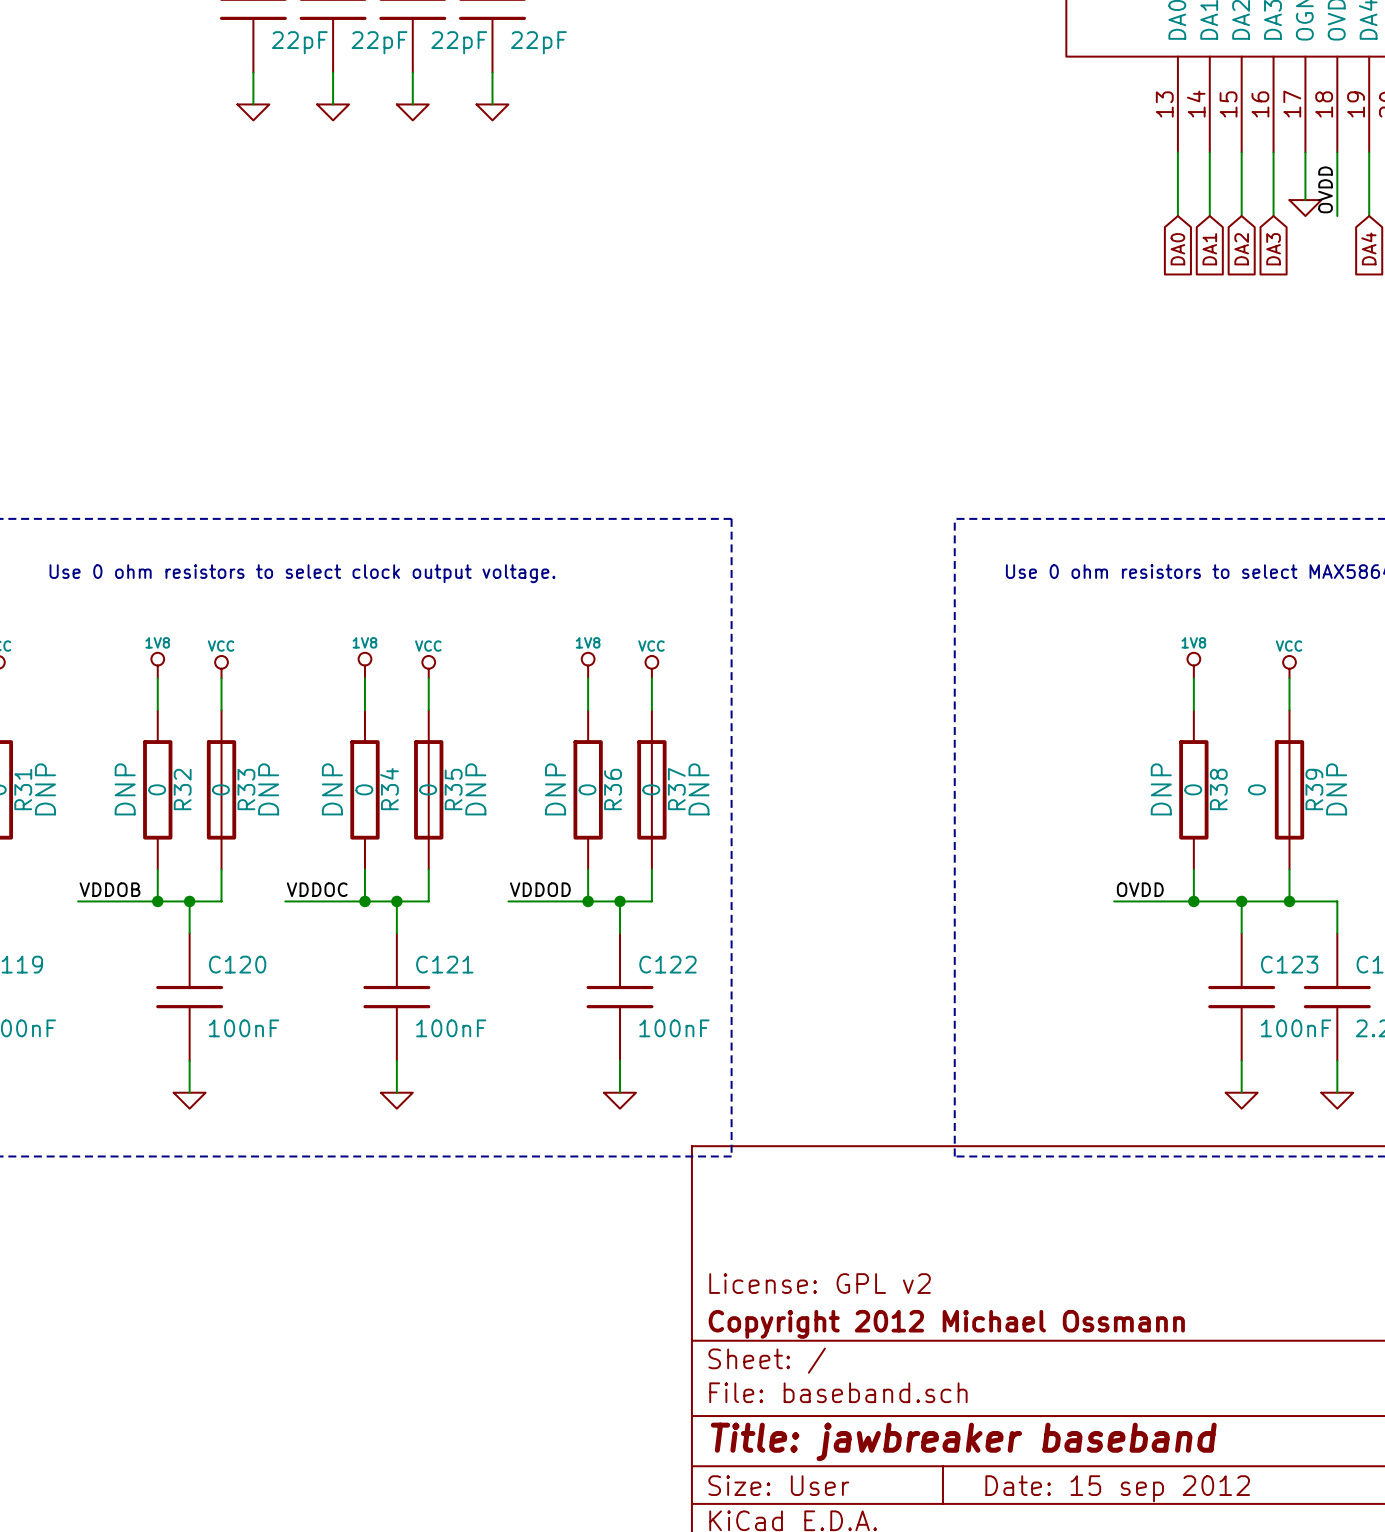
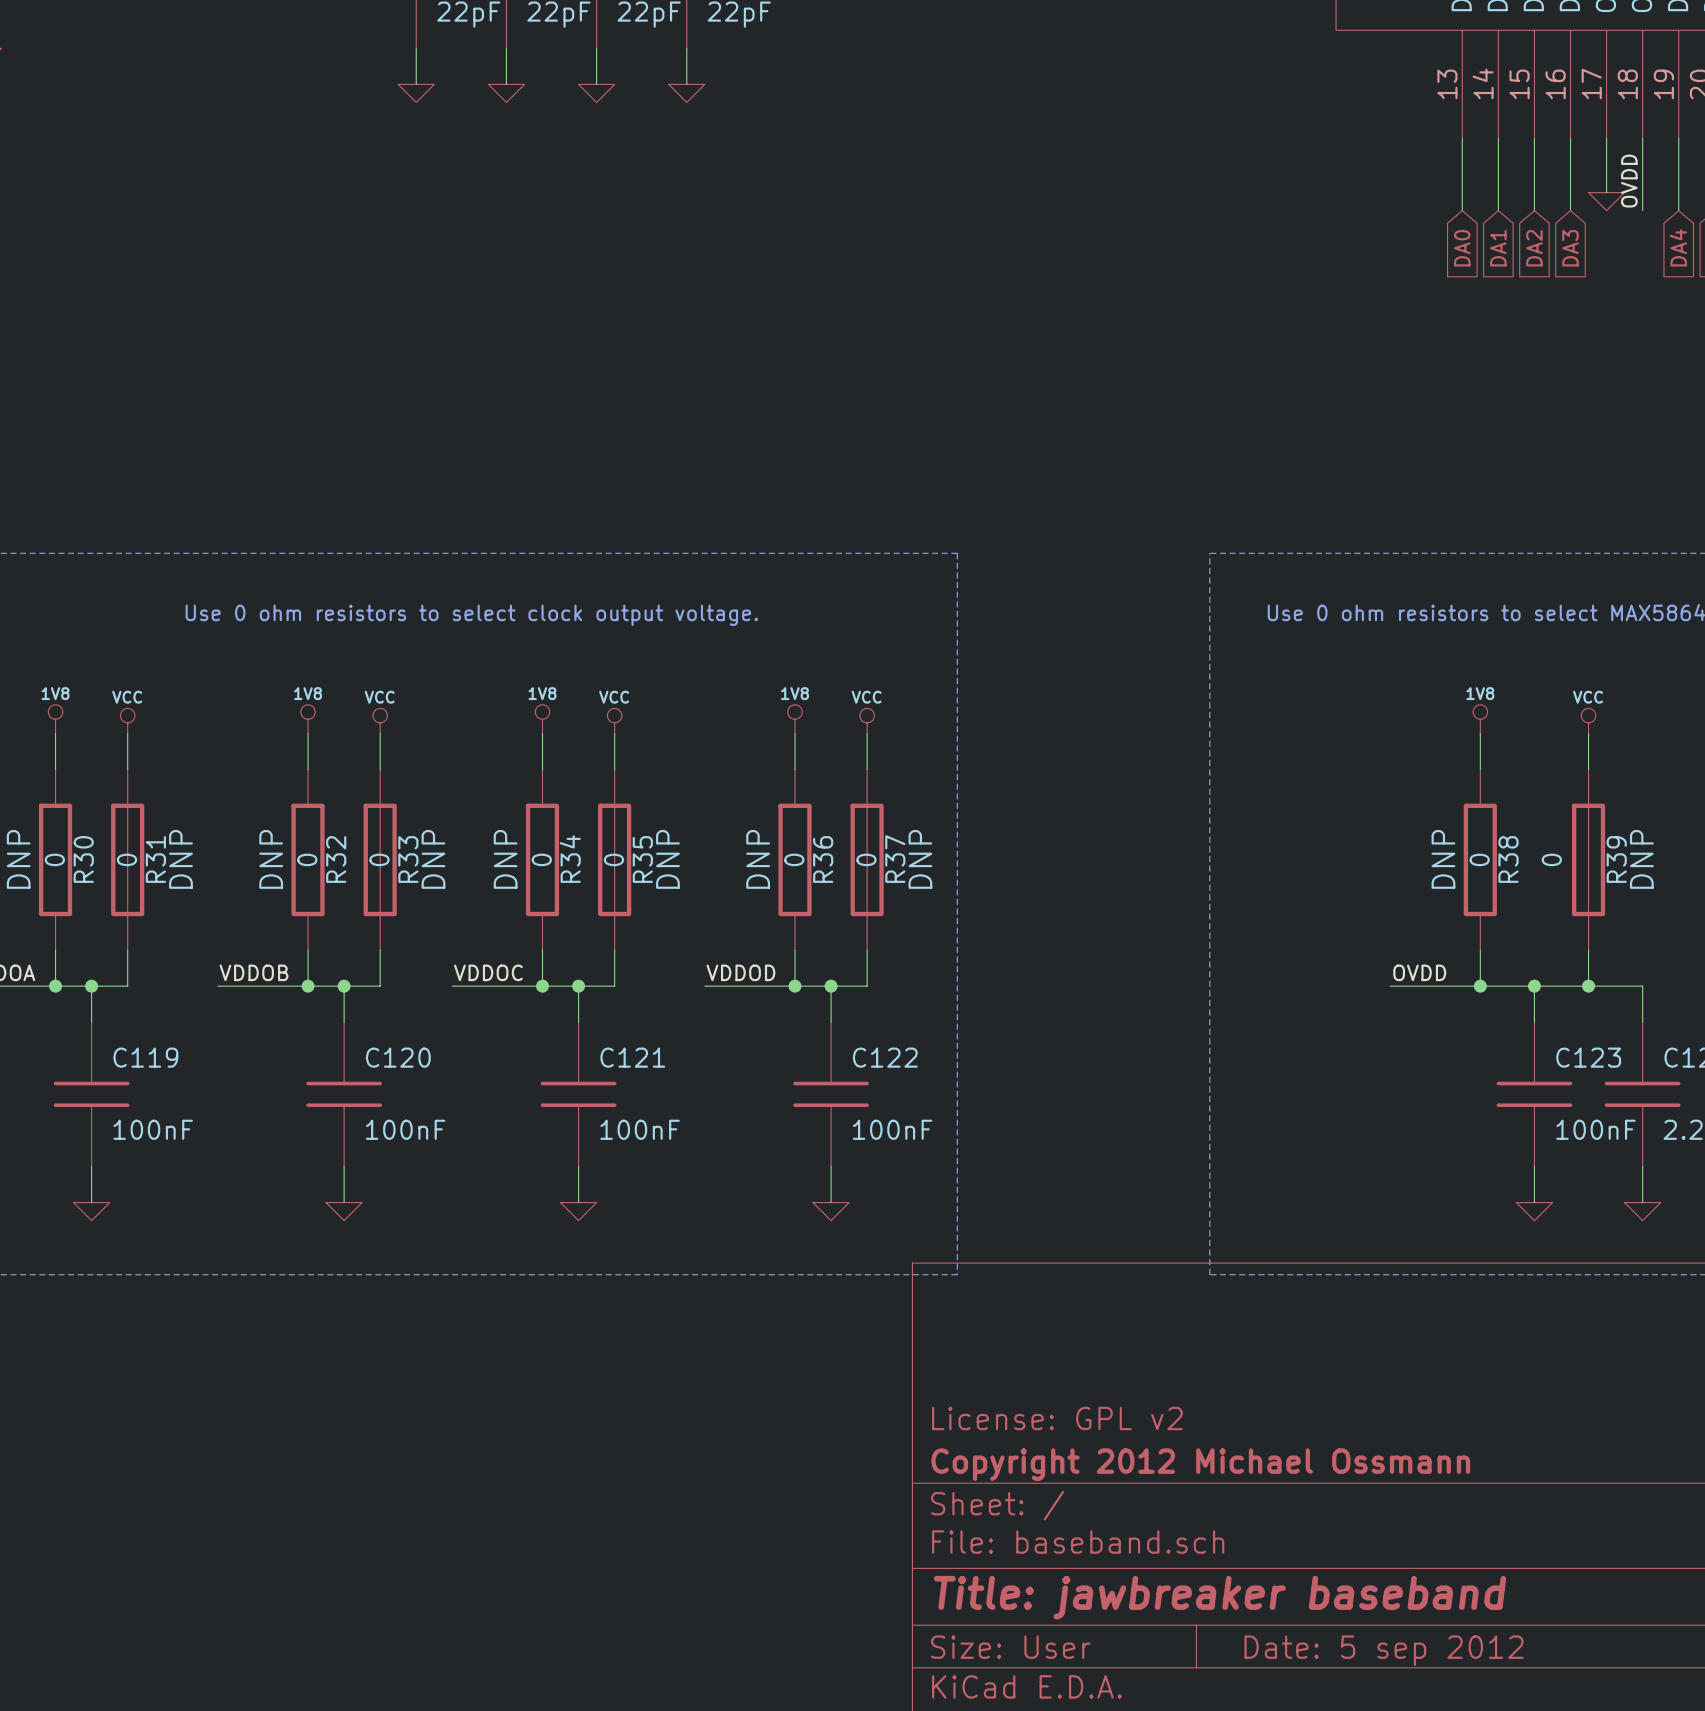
title block: Date: 15 sep 2012 (1117, 1488) -> Date: 5 sep 2012 (1384, 1650)

